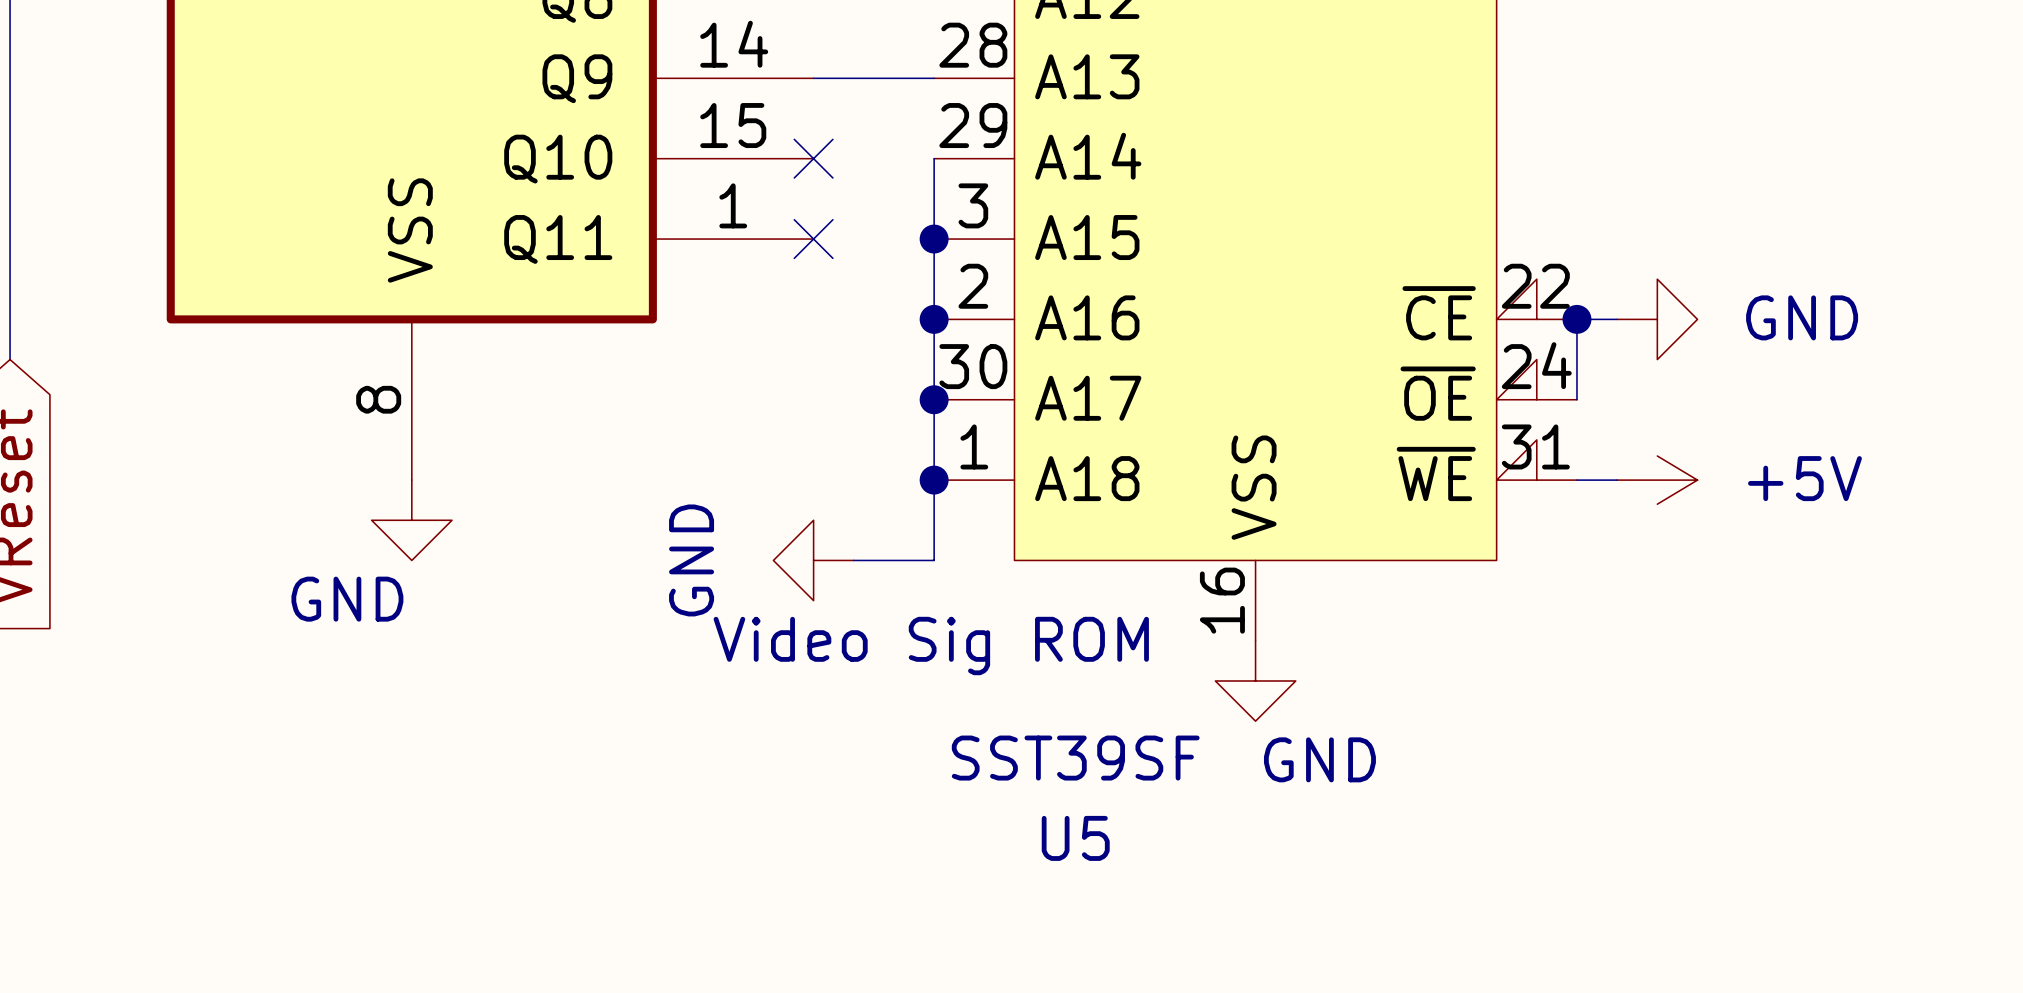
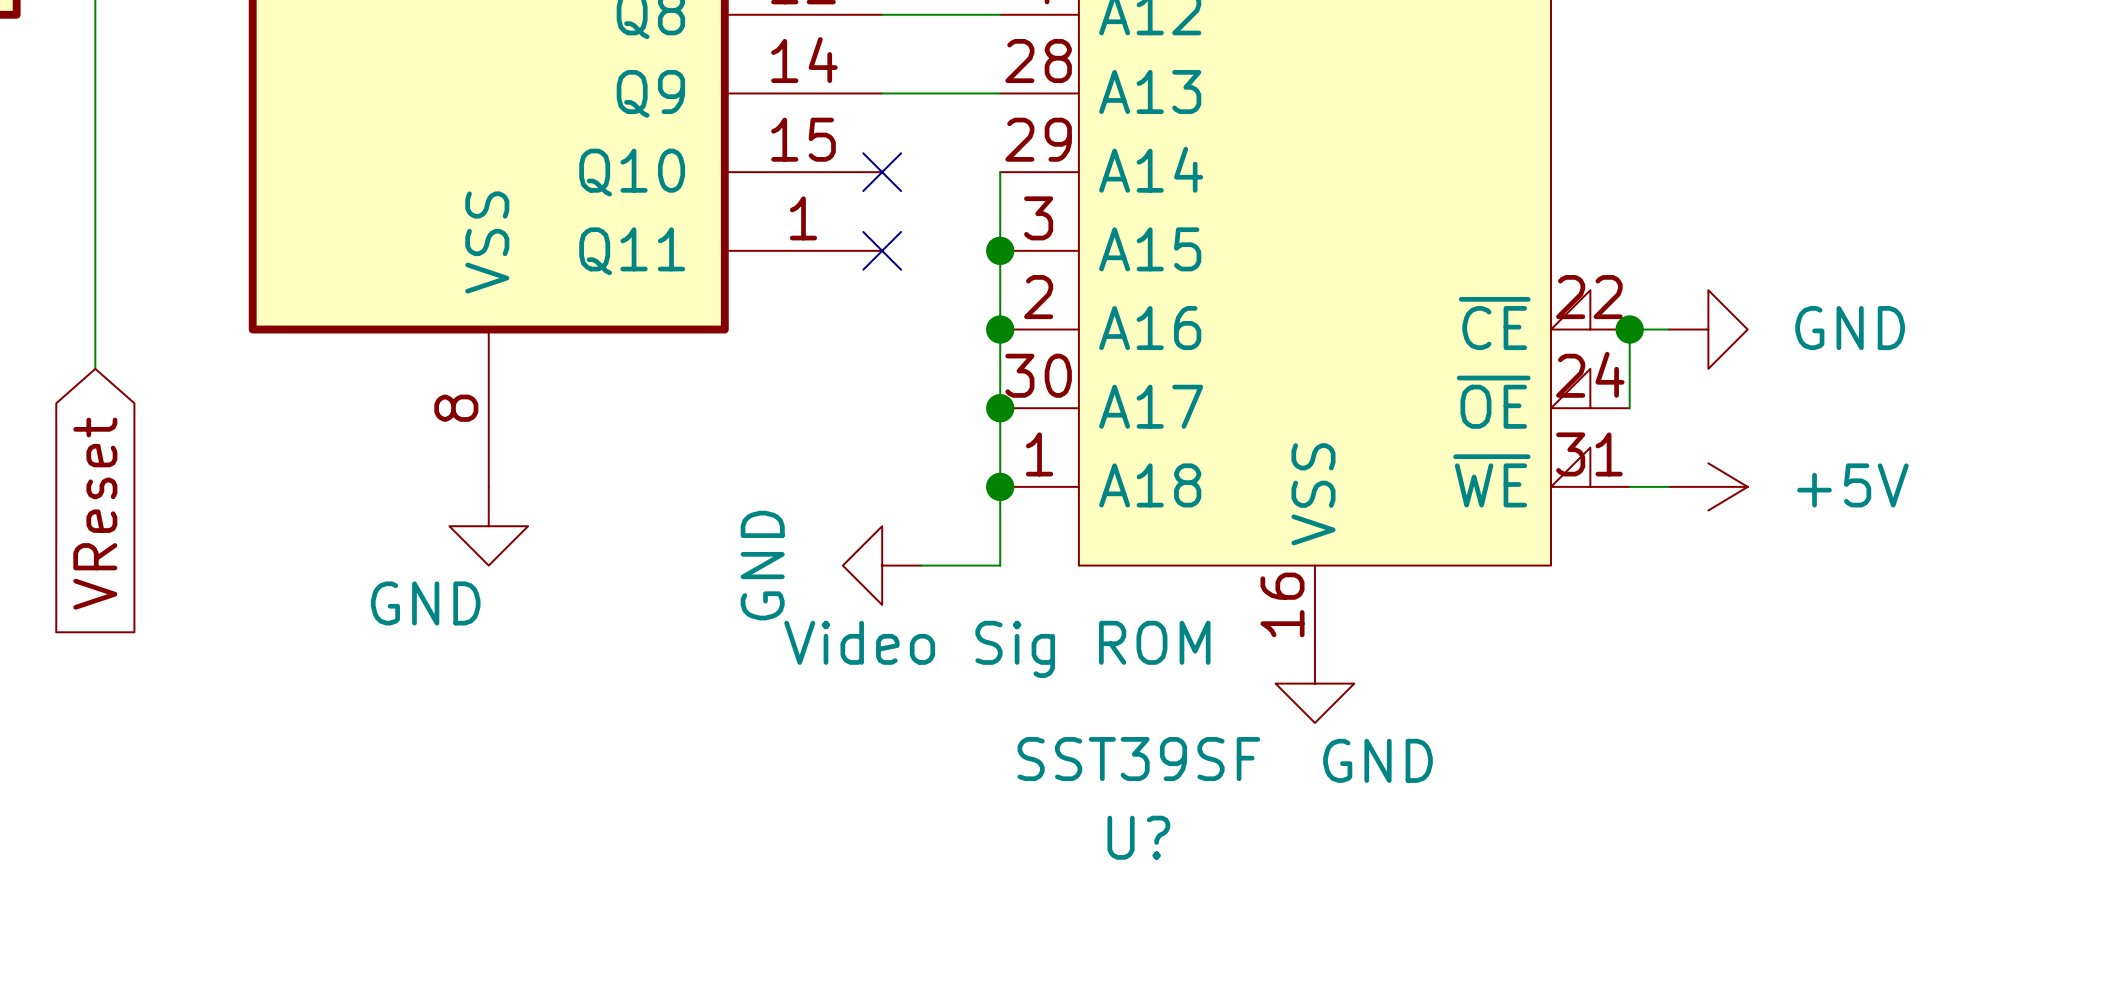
U5 name: U5 (1075, 838) -> U? (1138, 837)

